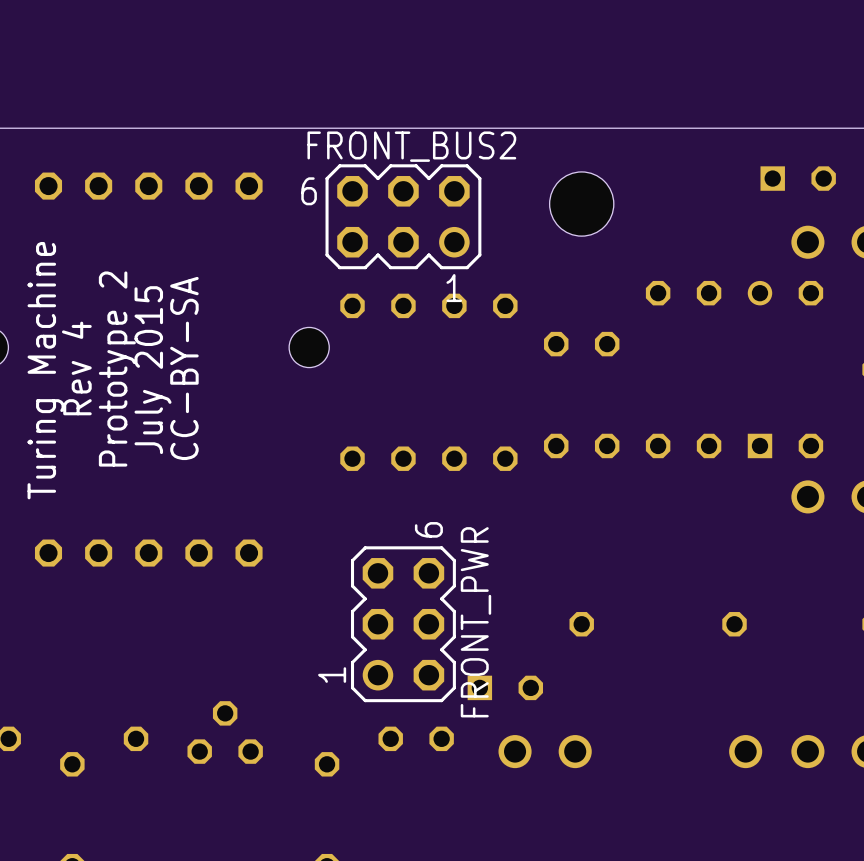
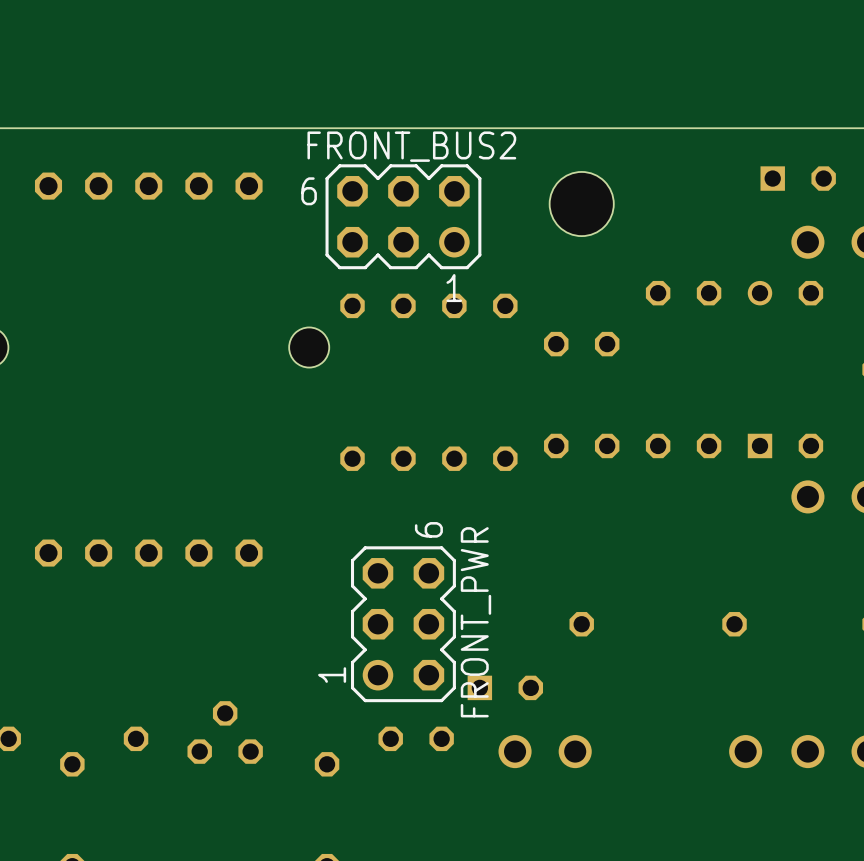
text: Rev 4 (76, 368) -> none
text: CC-BY-SA (184, 368) -> none
text: Prototype 2 (117, 369) -> none
text: Turing Machine (46, 370) -> none
text: July 2015 (153, 370) -> none

